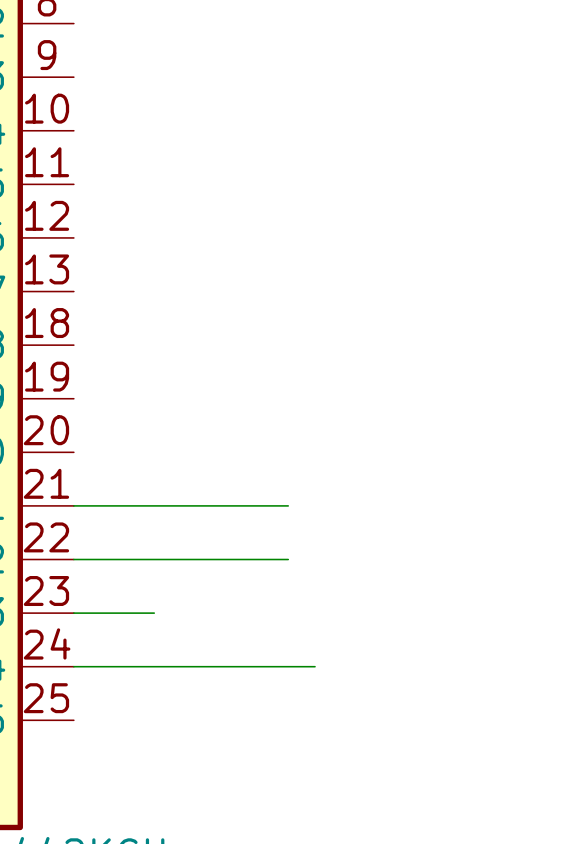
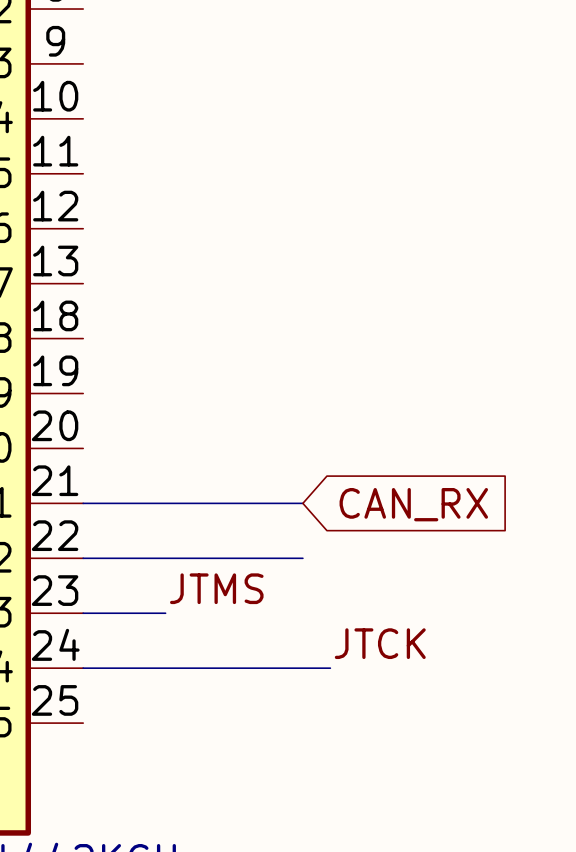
global label: none -> CAN_RX (413, 504)
label: none -> JTMS (216, 588)
label: none -> JTCK (380, 643)

